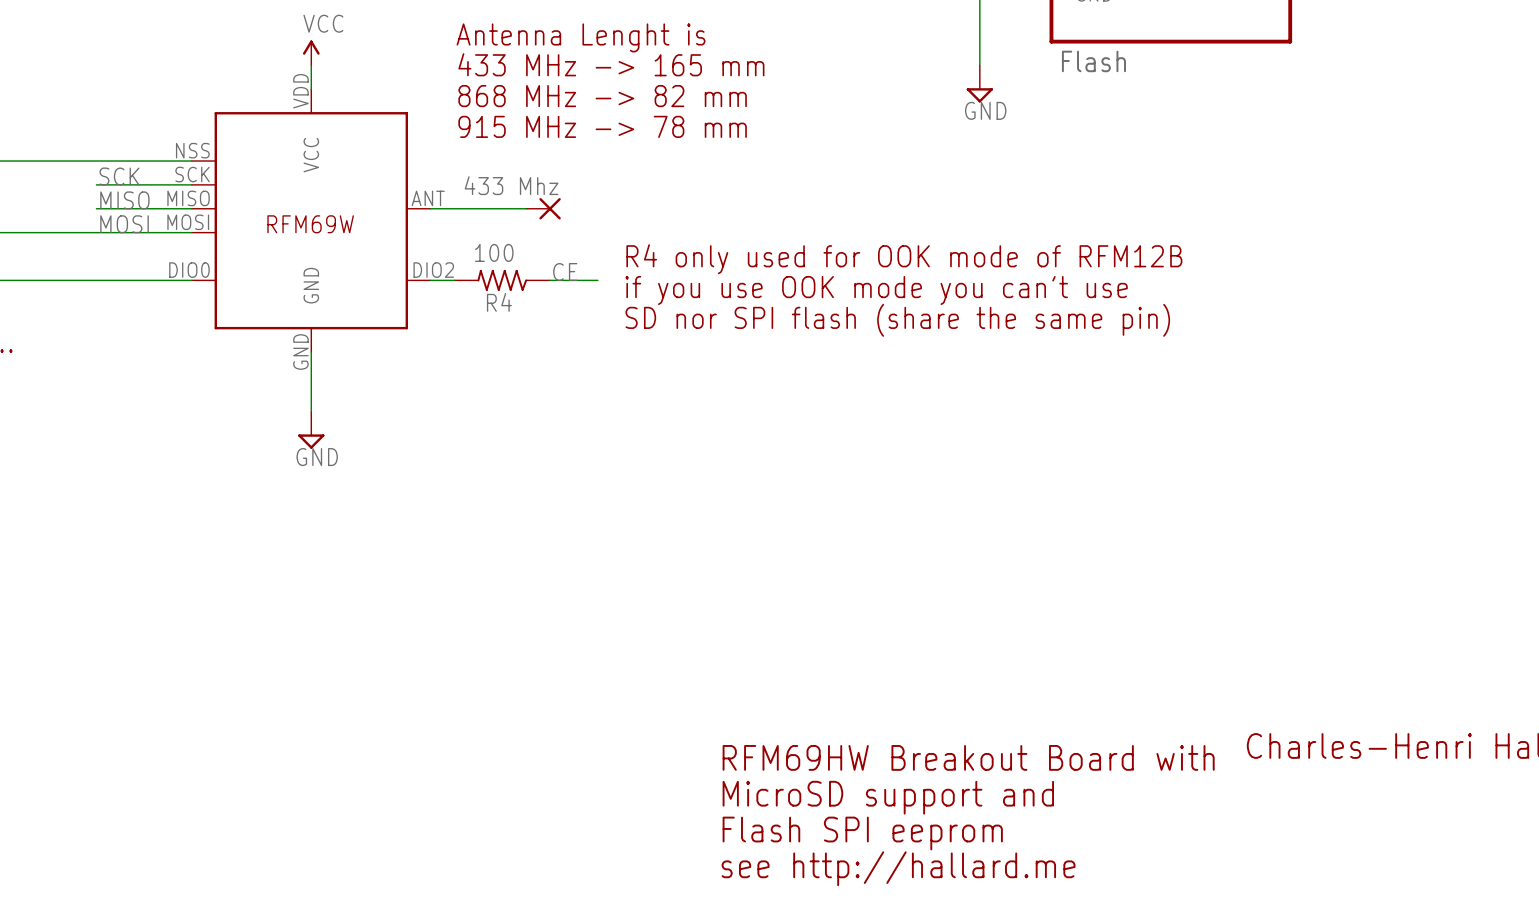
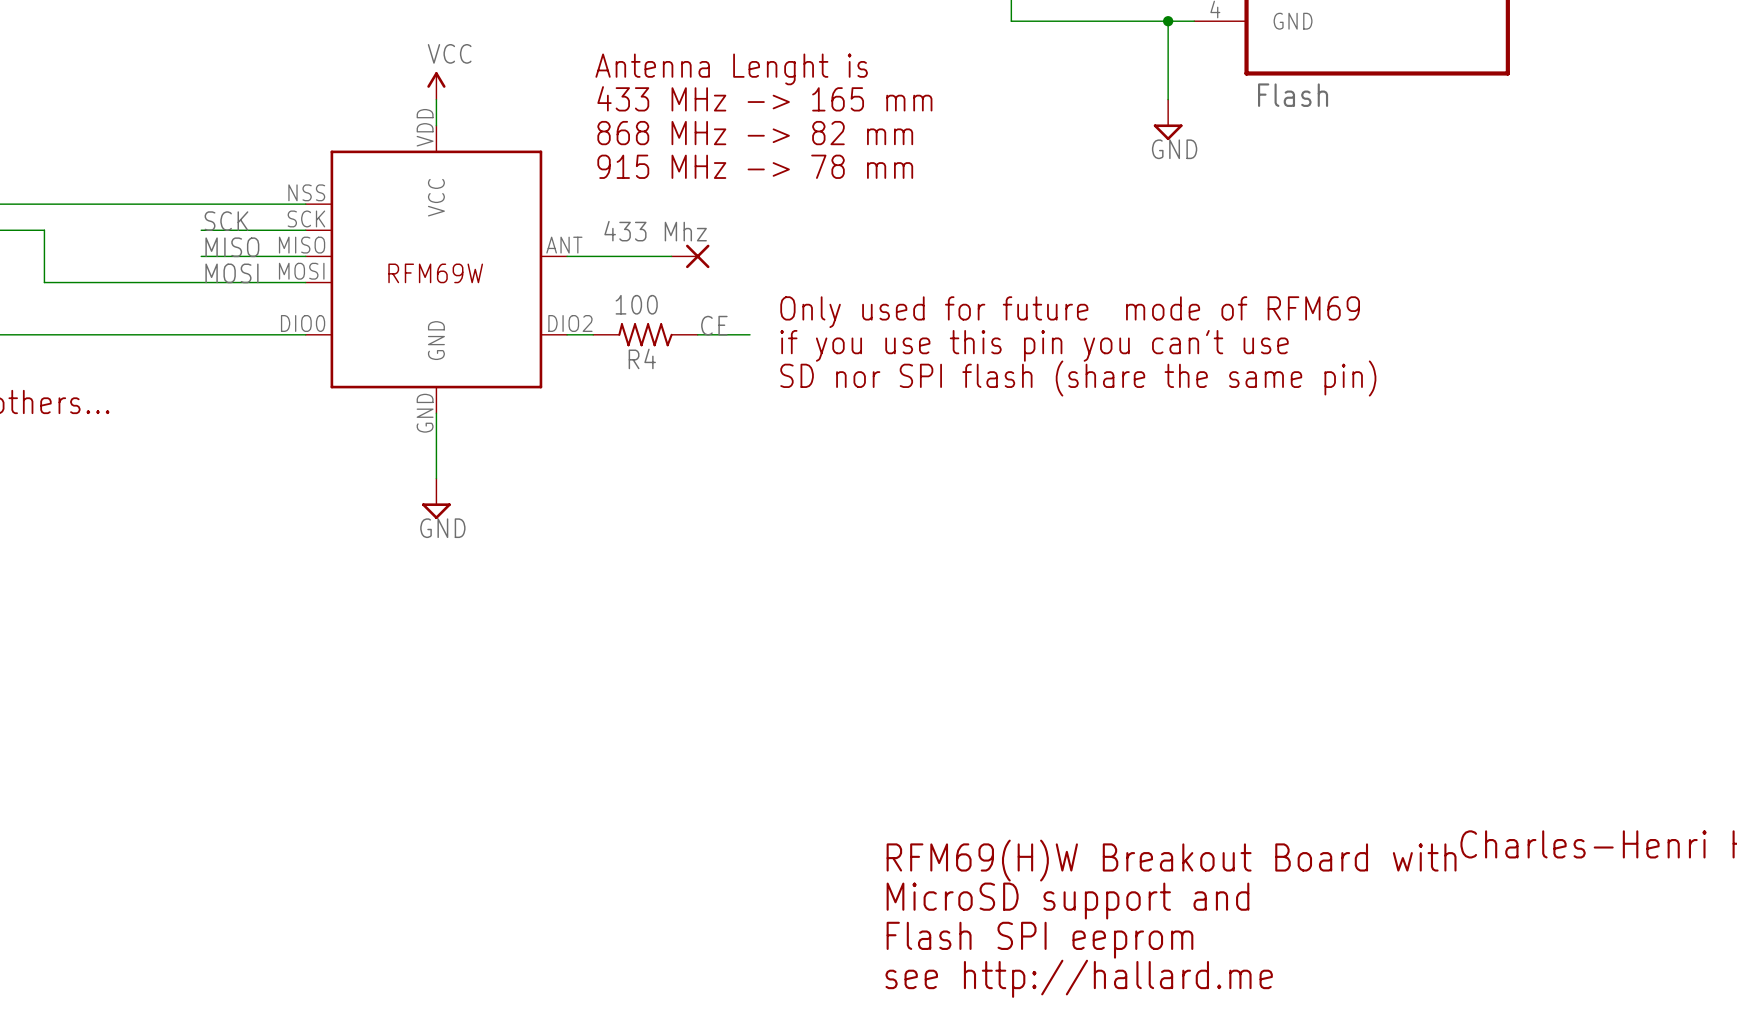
text: R4 only used for OOK mode of RFM12B (904, 259) -> Only used for future mode of RFM69 (1070, 312)
text: if you use OOK mode you can't use (876, 290) -> if you use this pin you can't use (1034, 345)
text: RFM69HW Breakout Board with (968, 757) -> RFM69(H)W Breakout Board with (1171, 860)

